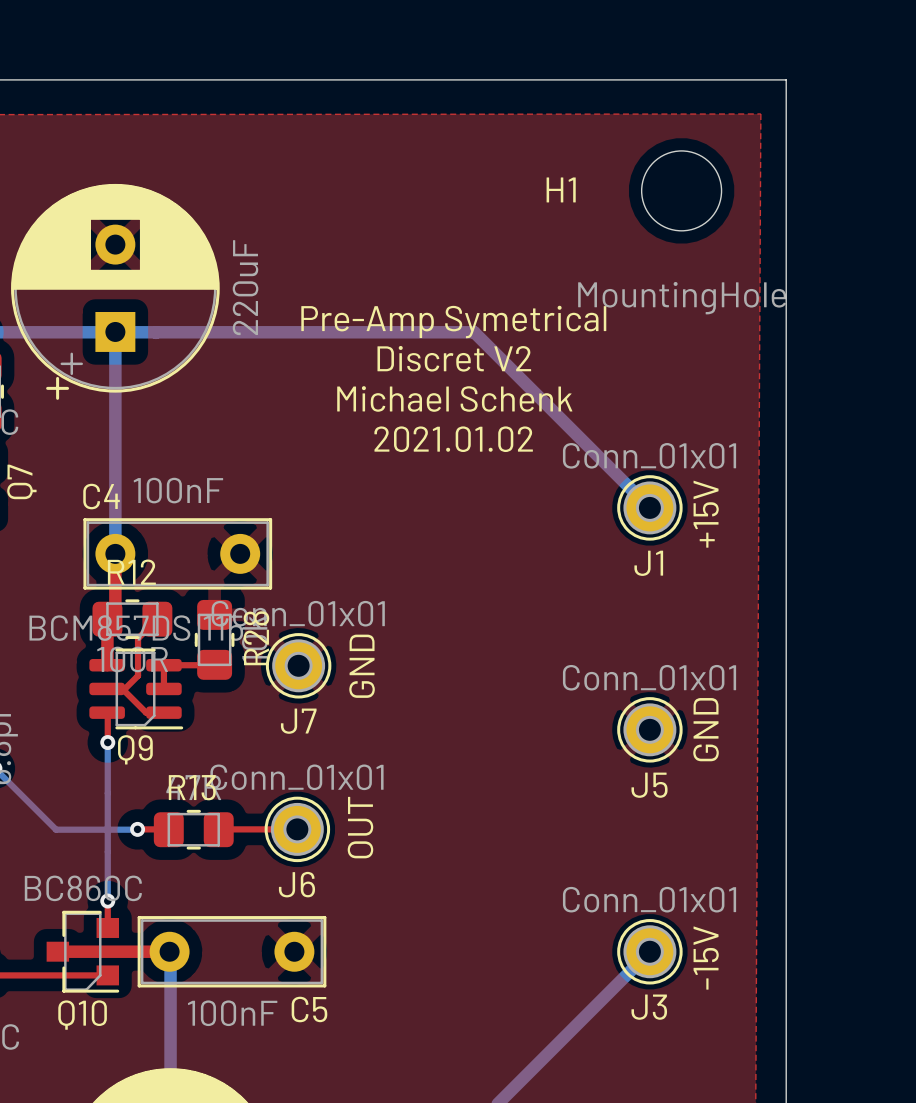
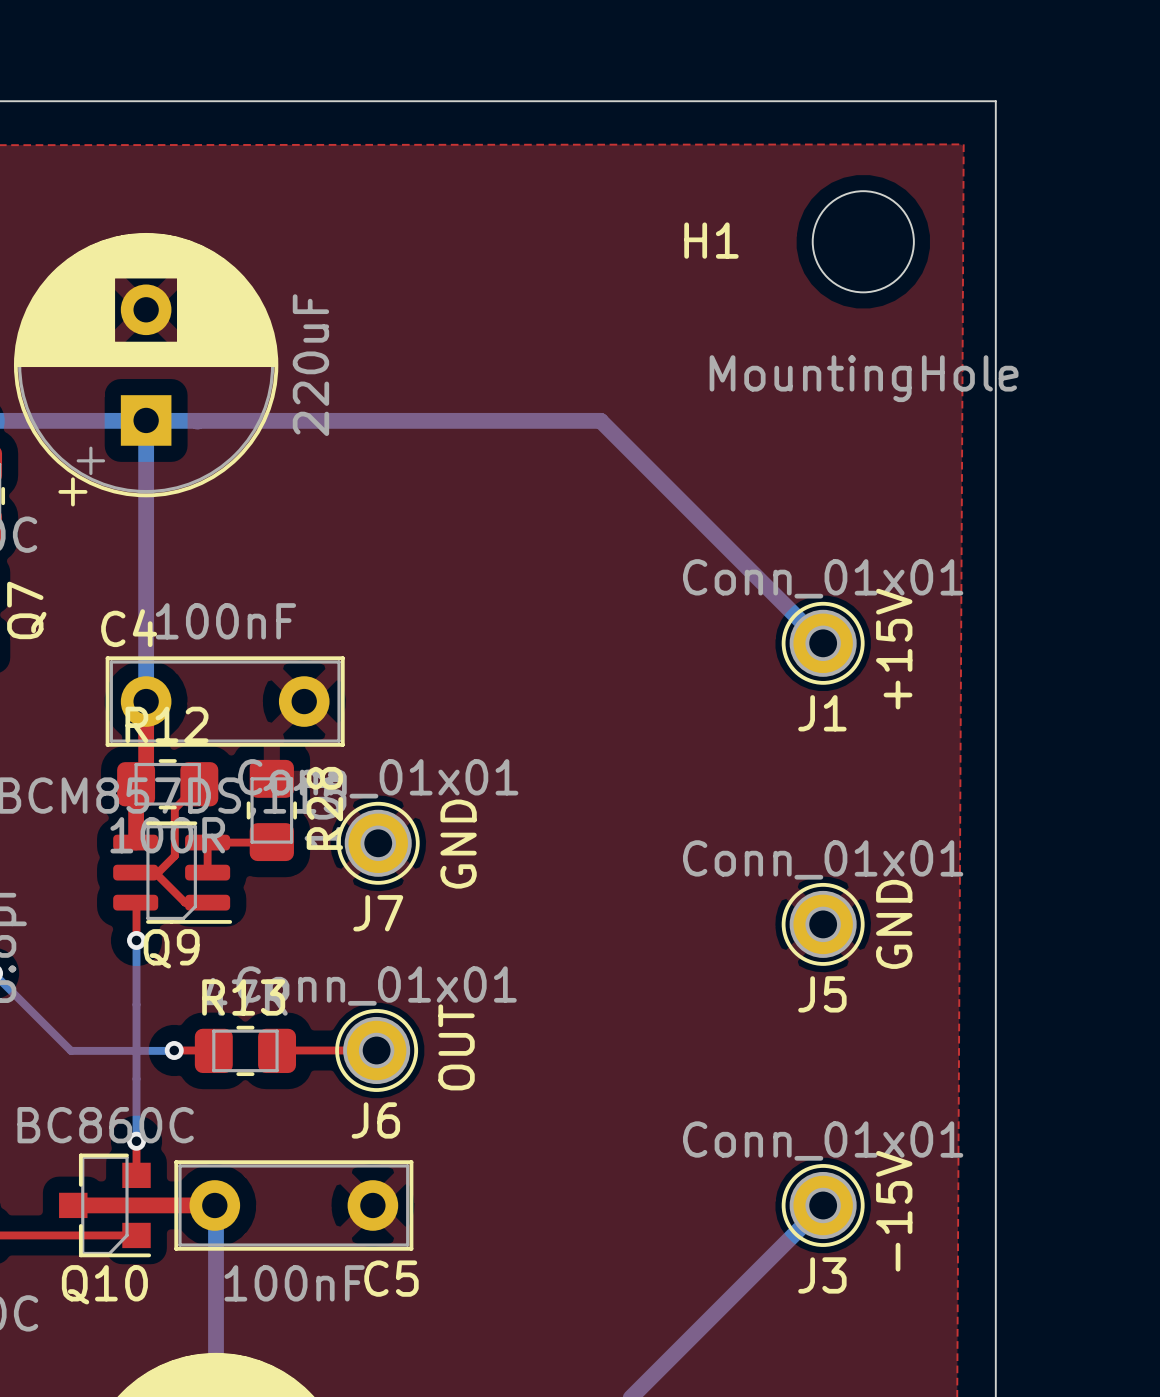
text: Pre-Amp Symetrical (453, 322) -> none
text: Discret V2 (454, 358) -> none
text: Michael Schenk (454, 398) -> none
text: 2021.01.02 (453, 439) -> none

